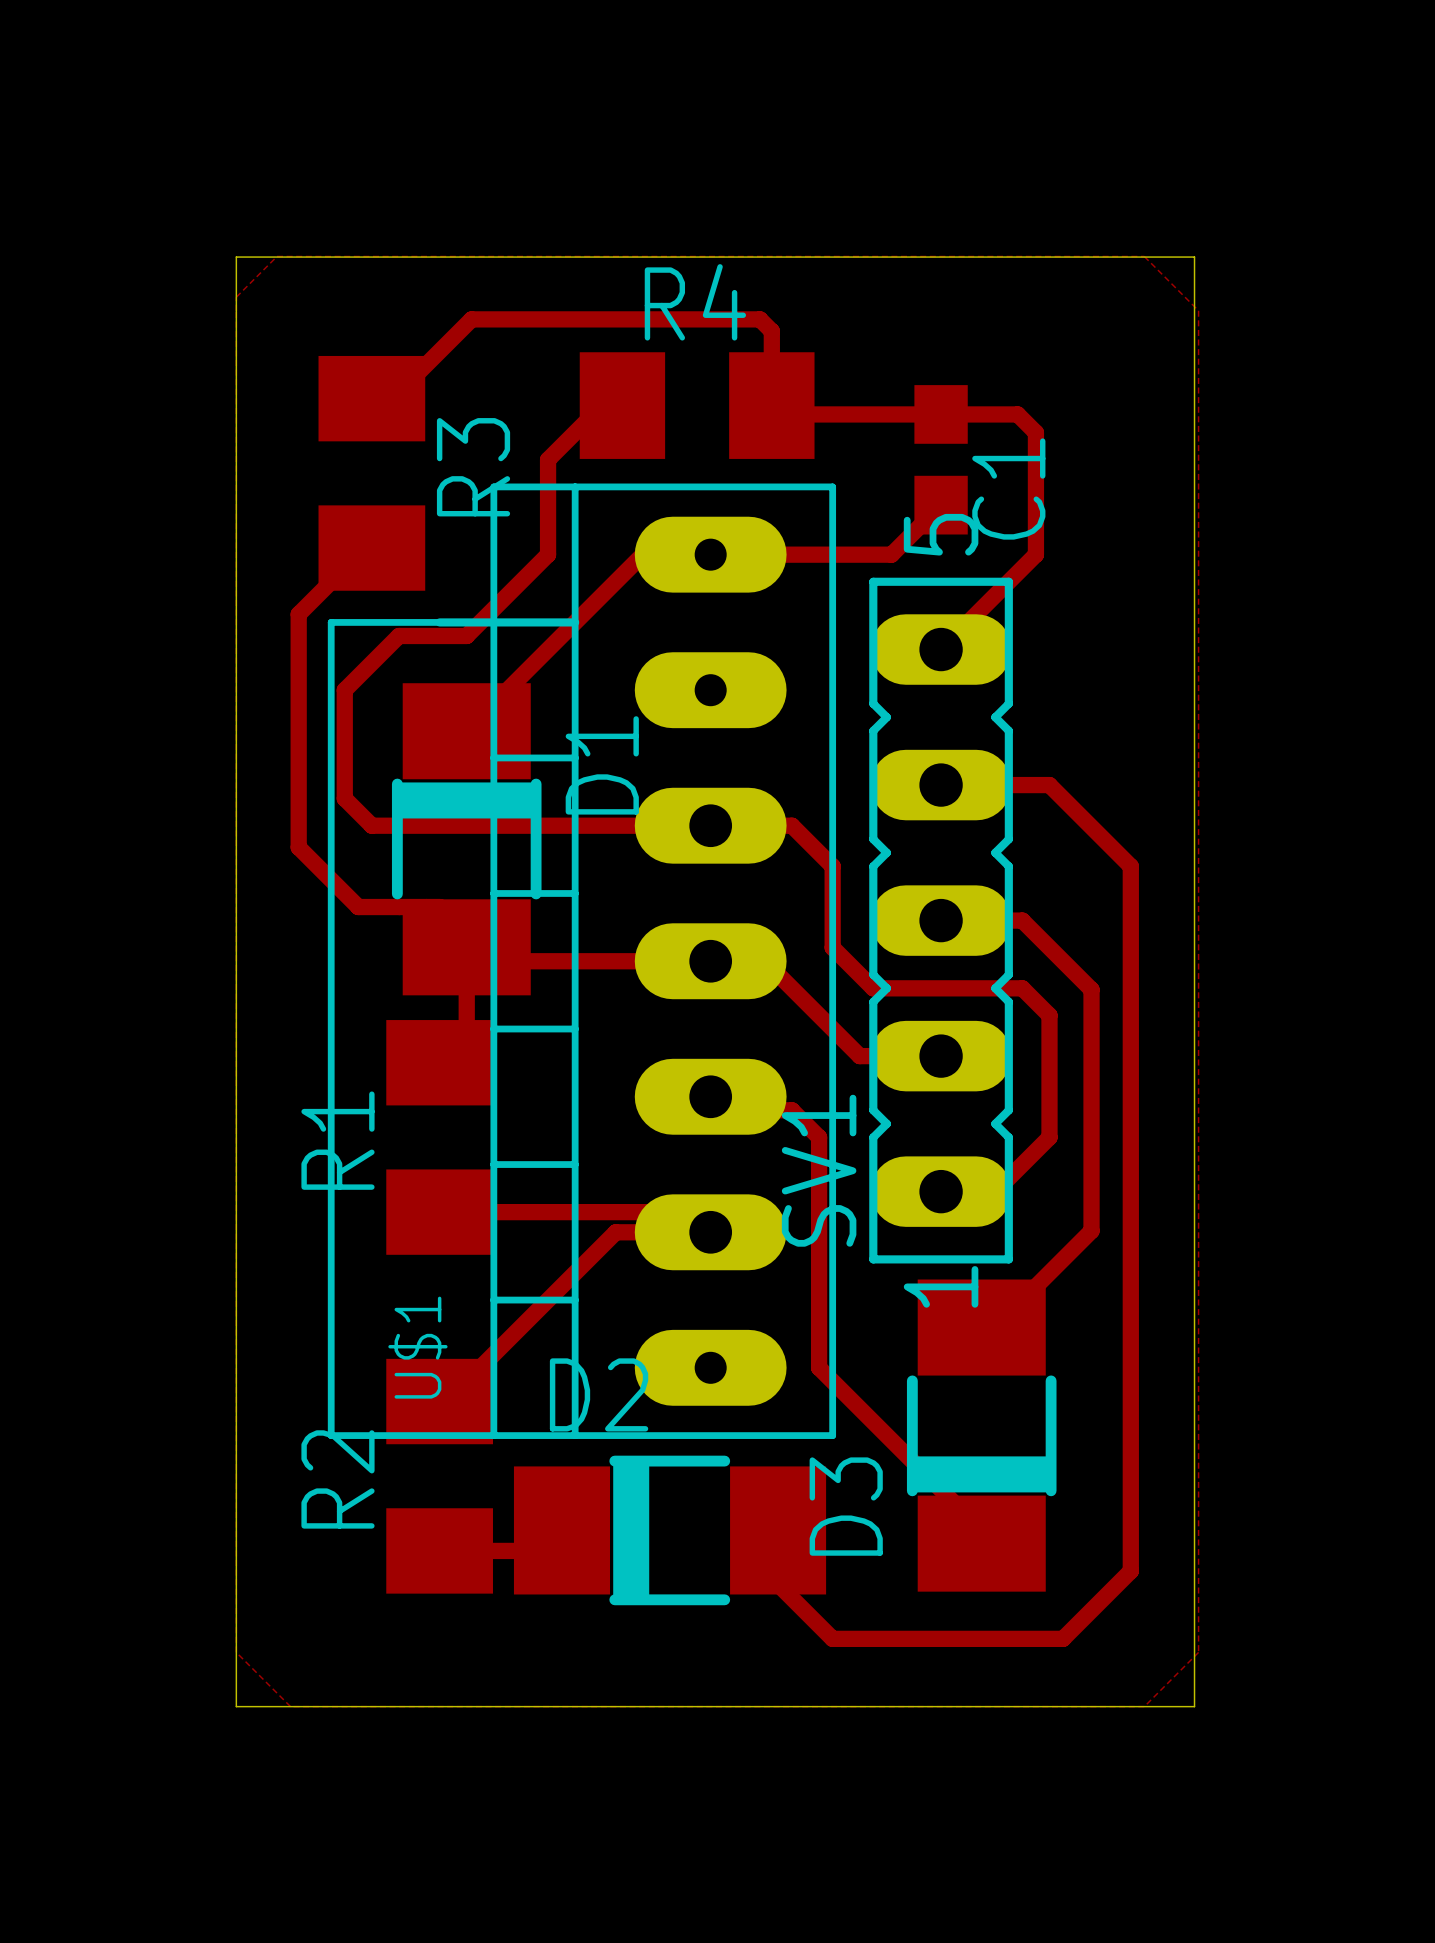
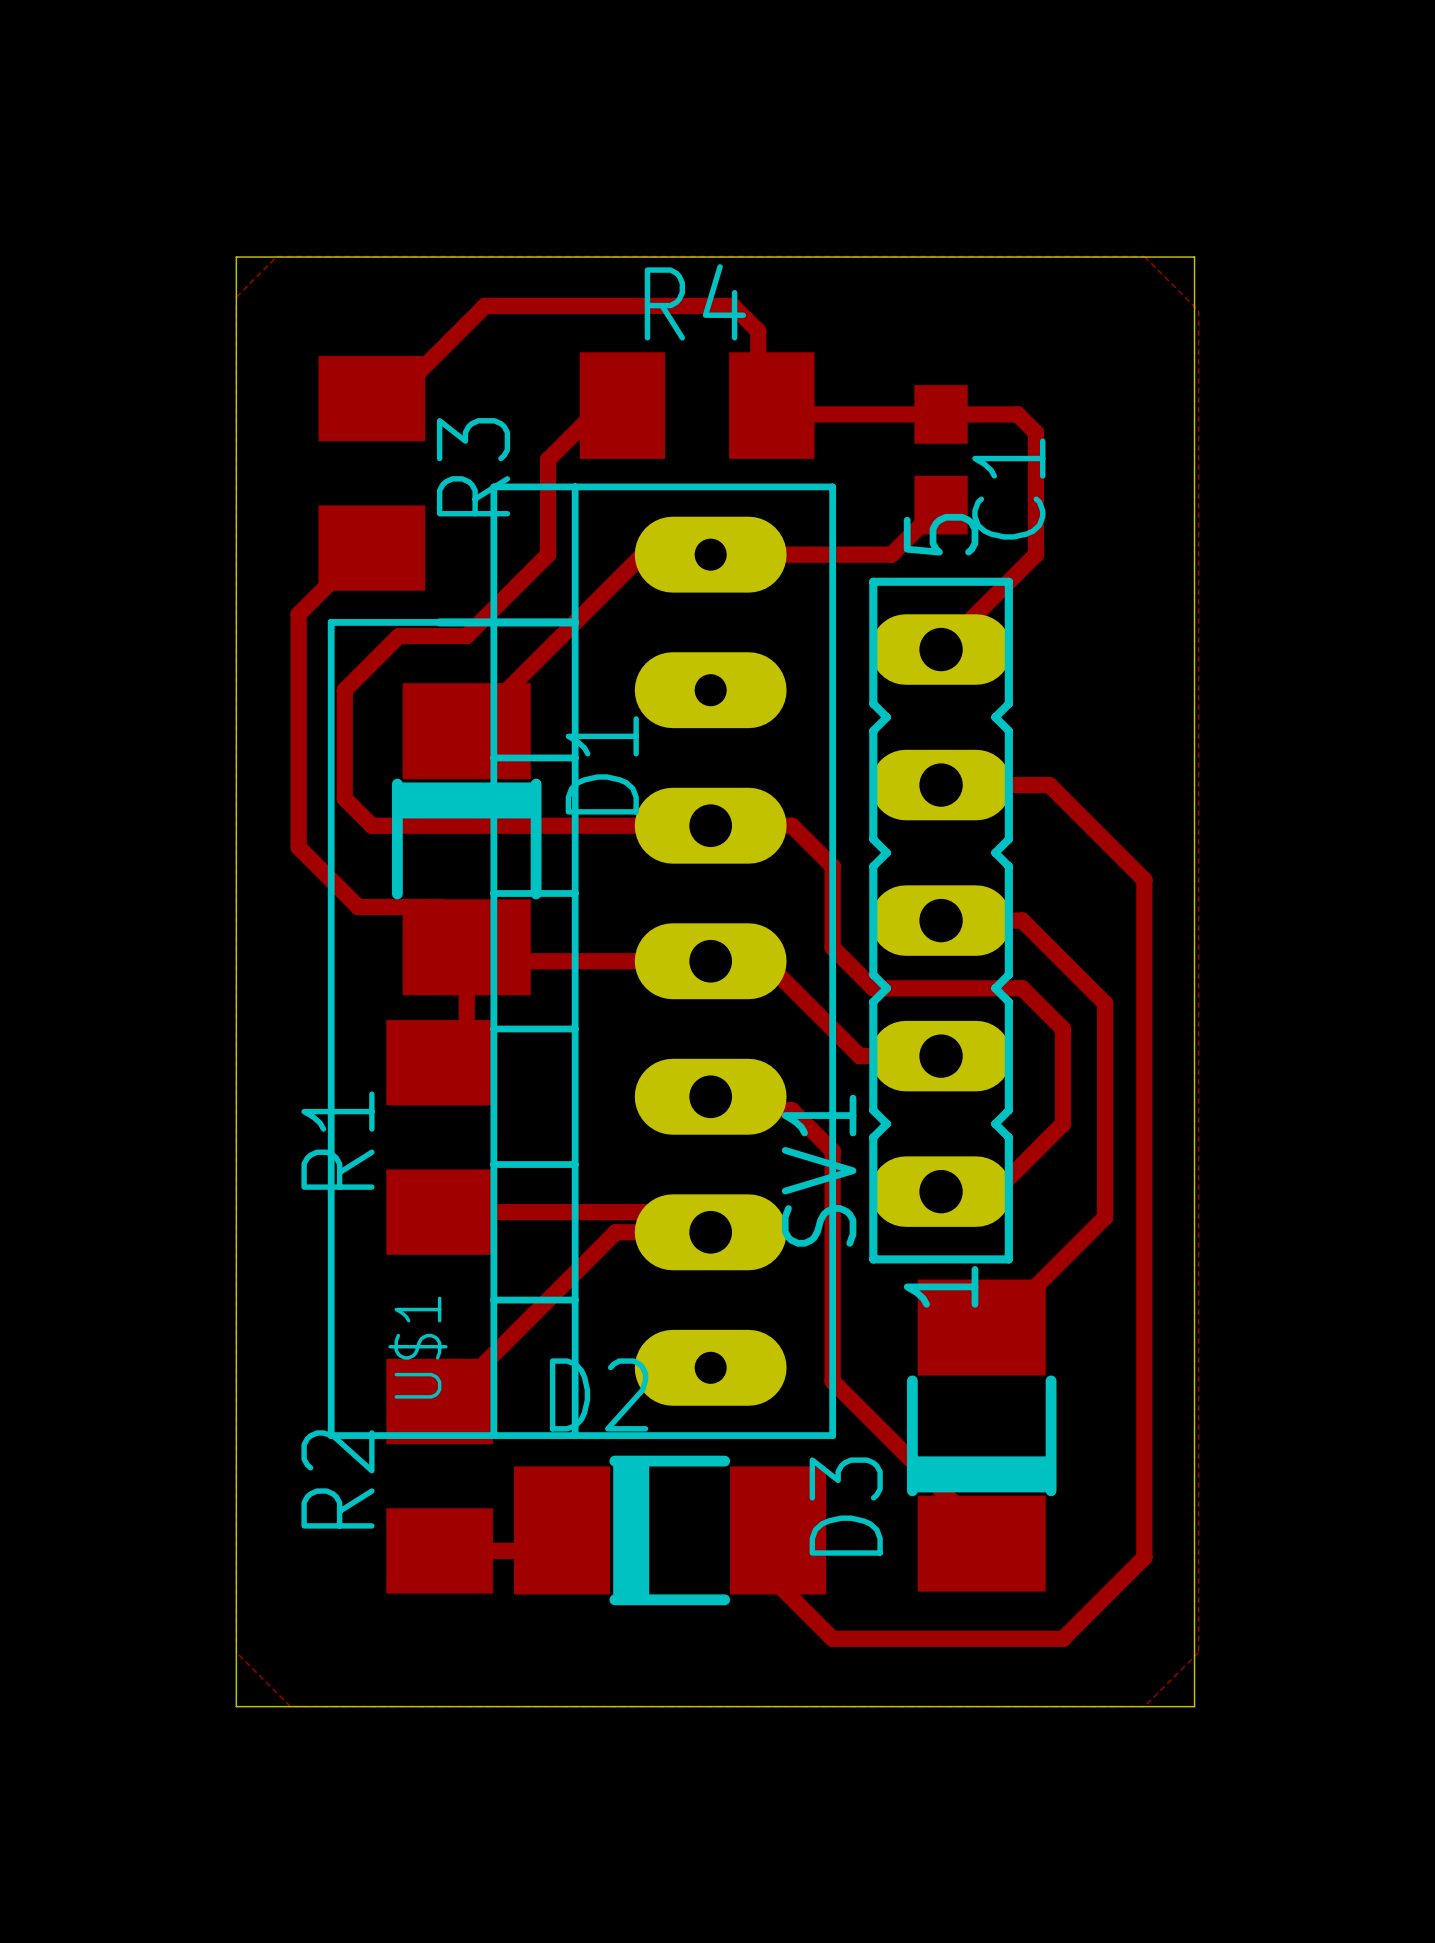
top track: (471, 319) (760, 319) (771, 331) (771, 405) -> (471, 319) (485, 305) (732, 305) (758, 331) (758, 392) (771, 405)
top track: (1130, 866) (1130, 1571) -> (1130, 866) (1144, 879) (1144, 1557) (1130, 1571)
top track: (1091, 989) (1091, 1230) -> (1091, 989) (1105, 1003) (1105, 1217) (1091, 1230)
top track: (1049, 1015) (1049, 1137) -> (1049, 1015) (1063, 1029) (1063, 1123) (1049, 1137)
top track: (819, 1137) (819, 1367) (832, 1381) -> (819, 1137) (832, 1150) (832, 1381)

